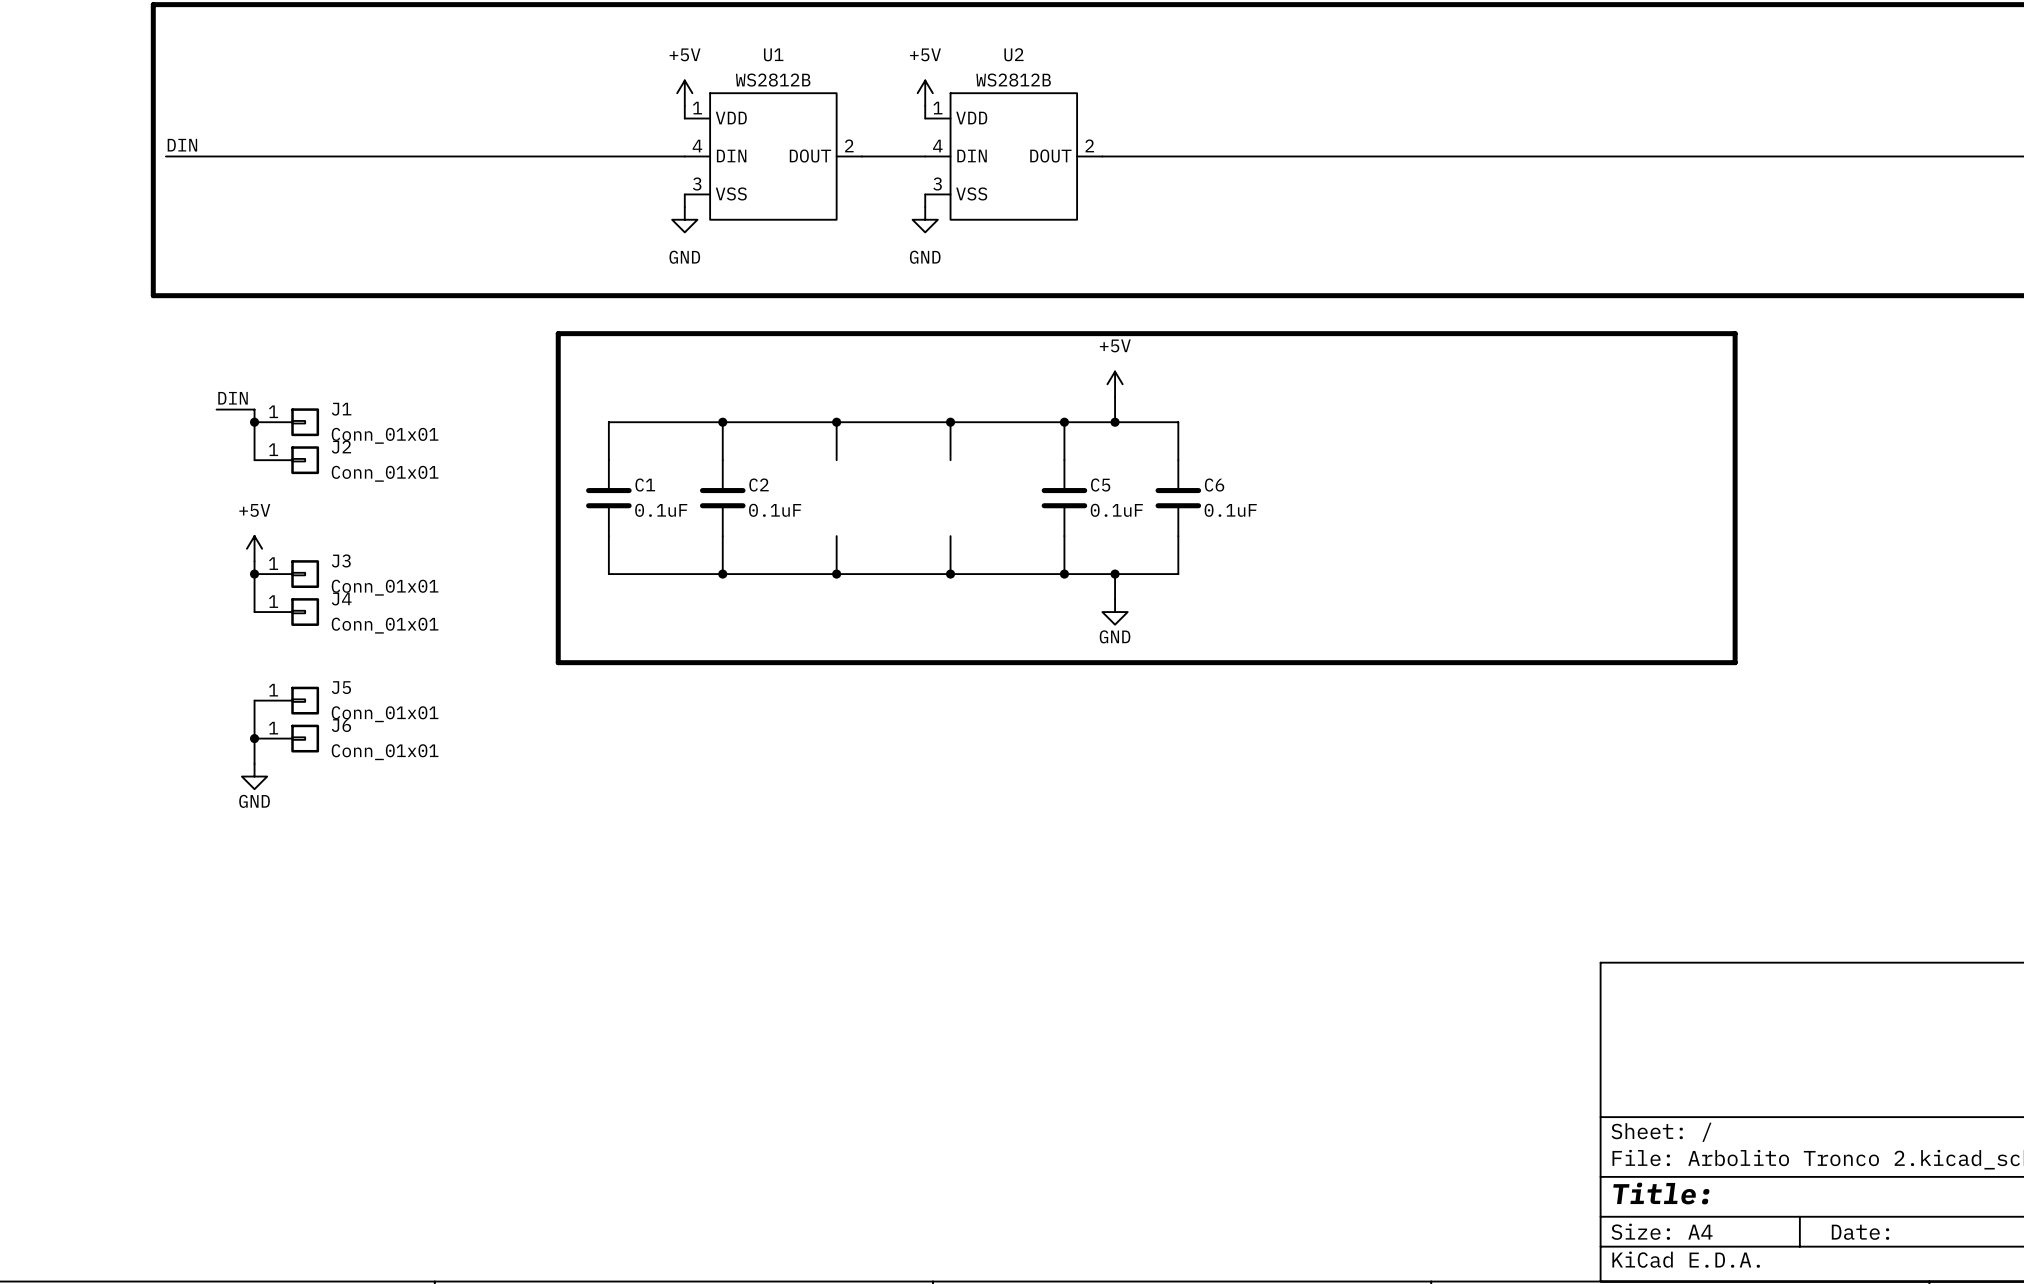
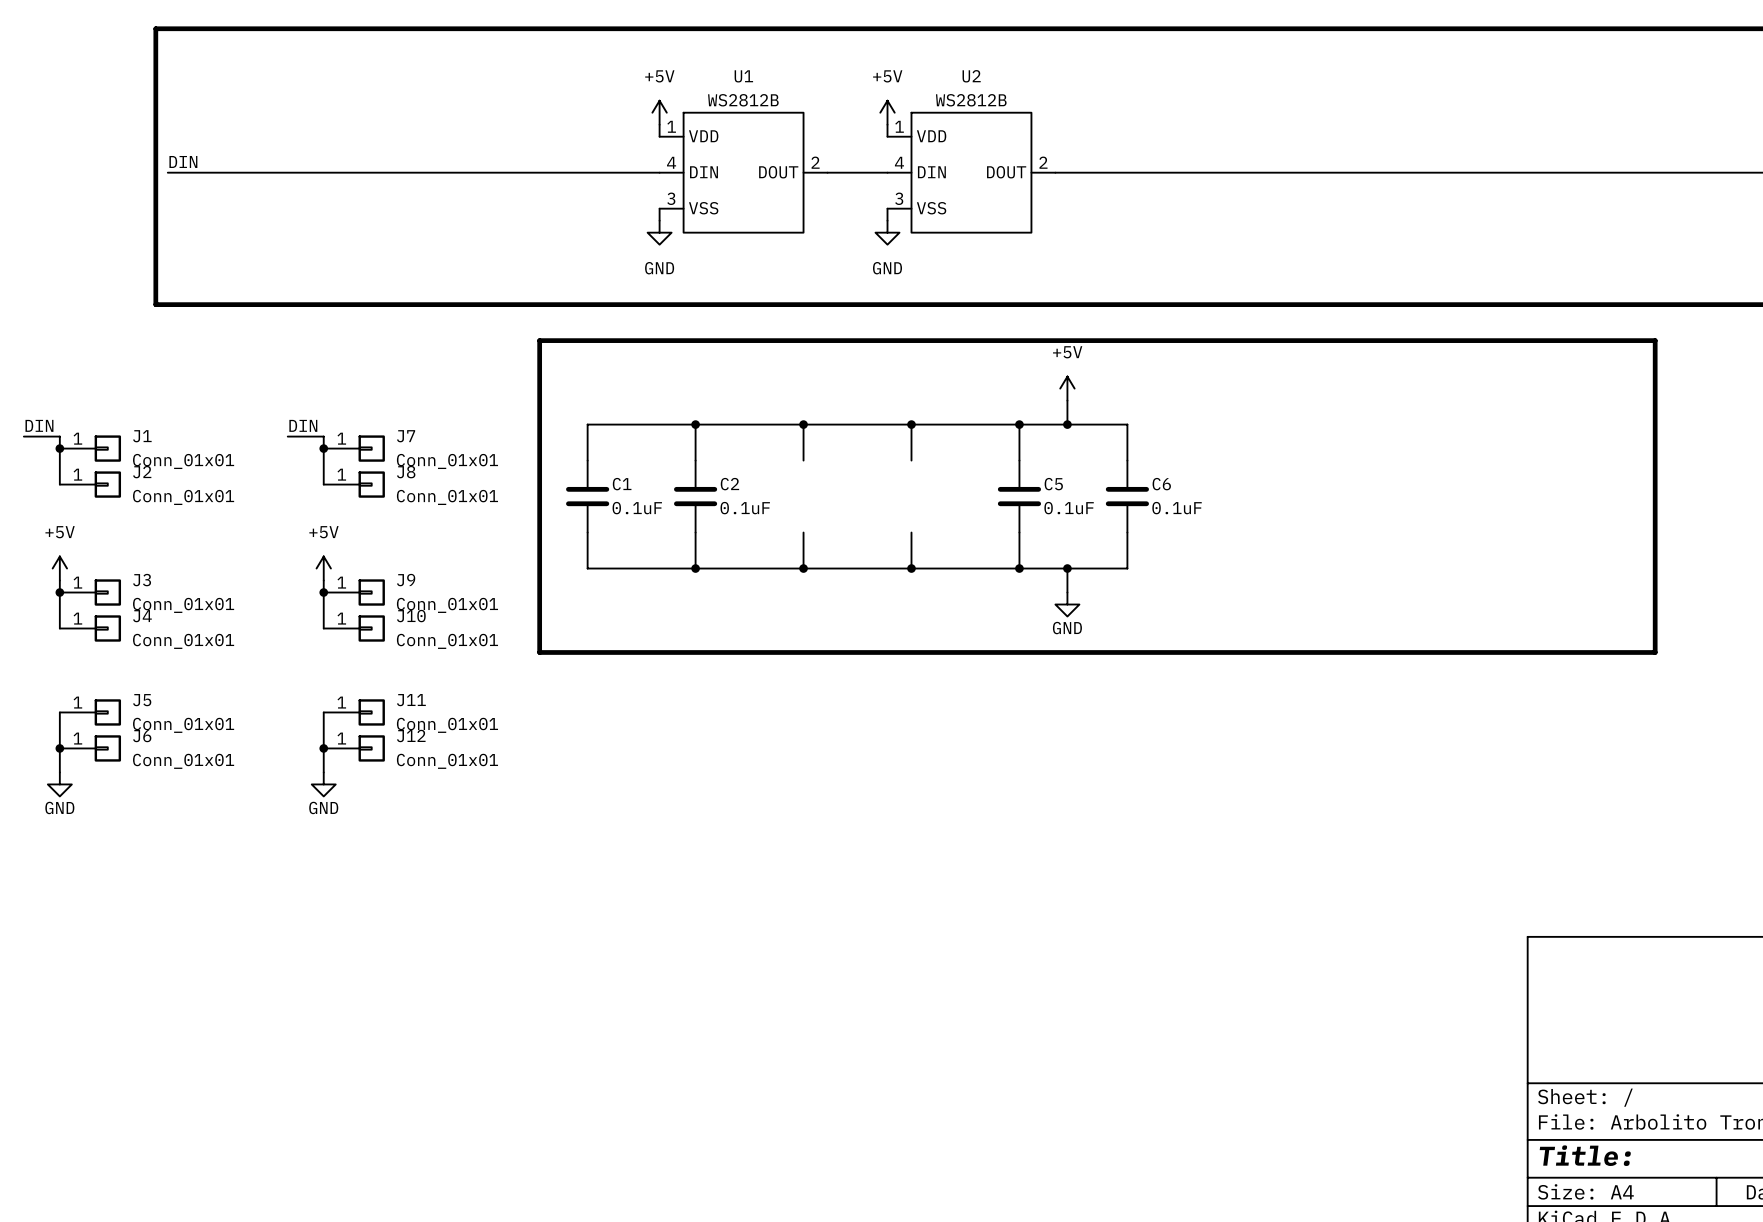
label position: DIN (233, 398) -> DIN (303, 425)
wire: (216, 409) (254, 409) (254, 460) -> (287, 436) (323, 436) (323, 484)
junction: (254, 422) -> none
J1 position: (286, 422) -> (90, 448)
label: none -> DIN (39, 425)
wire: none -> (23, 436) (59, 436) (59, 484)
junction: none -> (59, 448)
junction: none -> (323, 448)
J7: none -> Conn_01x01 (354, 448)
J2 position: (286, 460) -> (90, 484)
J8: none -> Conn_01x01 (354, 484)
power symbol position: +5V (254, 548) -> +5V (323, 568)
wire: (254, 561) (254, 612) -> (323, 580) (323, 628)
power symbol: none -> +5V (59, 568)
junction: (254, 574) -> none
J3 position: (286, 574) -> (90, 592)
wire: none -> (59, 580) (59, 628)
junction: none -> (59, 592)
junction: none -> (323, 592)
J9: none -> Conn_01x01 (354, 592)
J4 position: (286, 612) -> (90, 628)
J10: none -> Conn_01x01 (354, 628)
wire: (254, 700) (254, 763) -> (323, 712) (323, 772)
J5 position: (286, 700) -> (90, 712)
wire: none -> (59, 712) (59, 772)
J11: none -> Conn_01x01 (354, 712)
junction: (254, 738) -> none
J6 position: (286, 738) -> (90, 748)
junction: none -> (59, 748)
junction: none -> (323, 748)
J12: none -> Conn_01x01 (354, 748)
power symbol position: GND (254, 776) -> GND (323, 784)
power symbol: none -> GND (59, 784)

